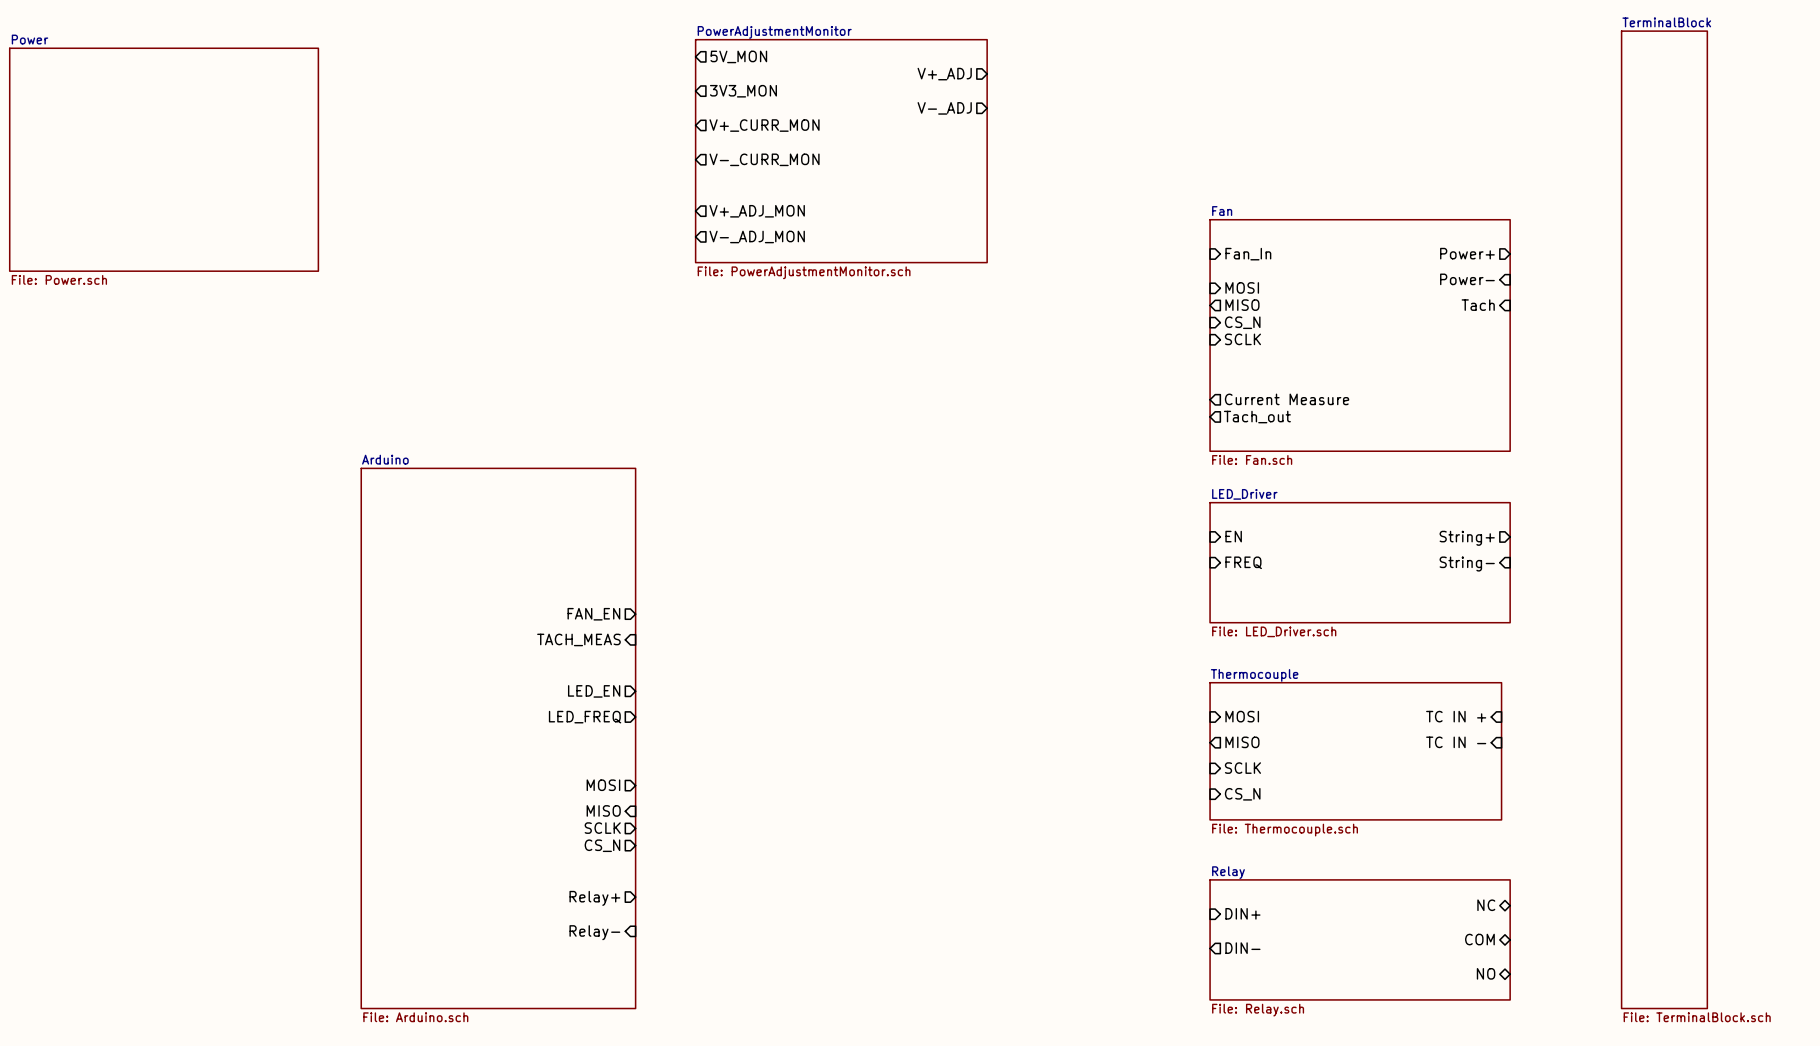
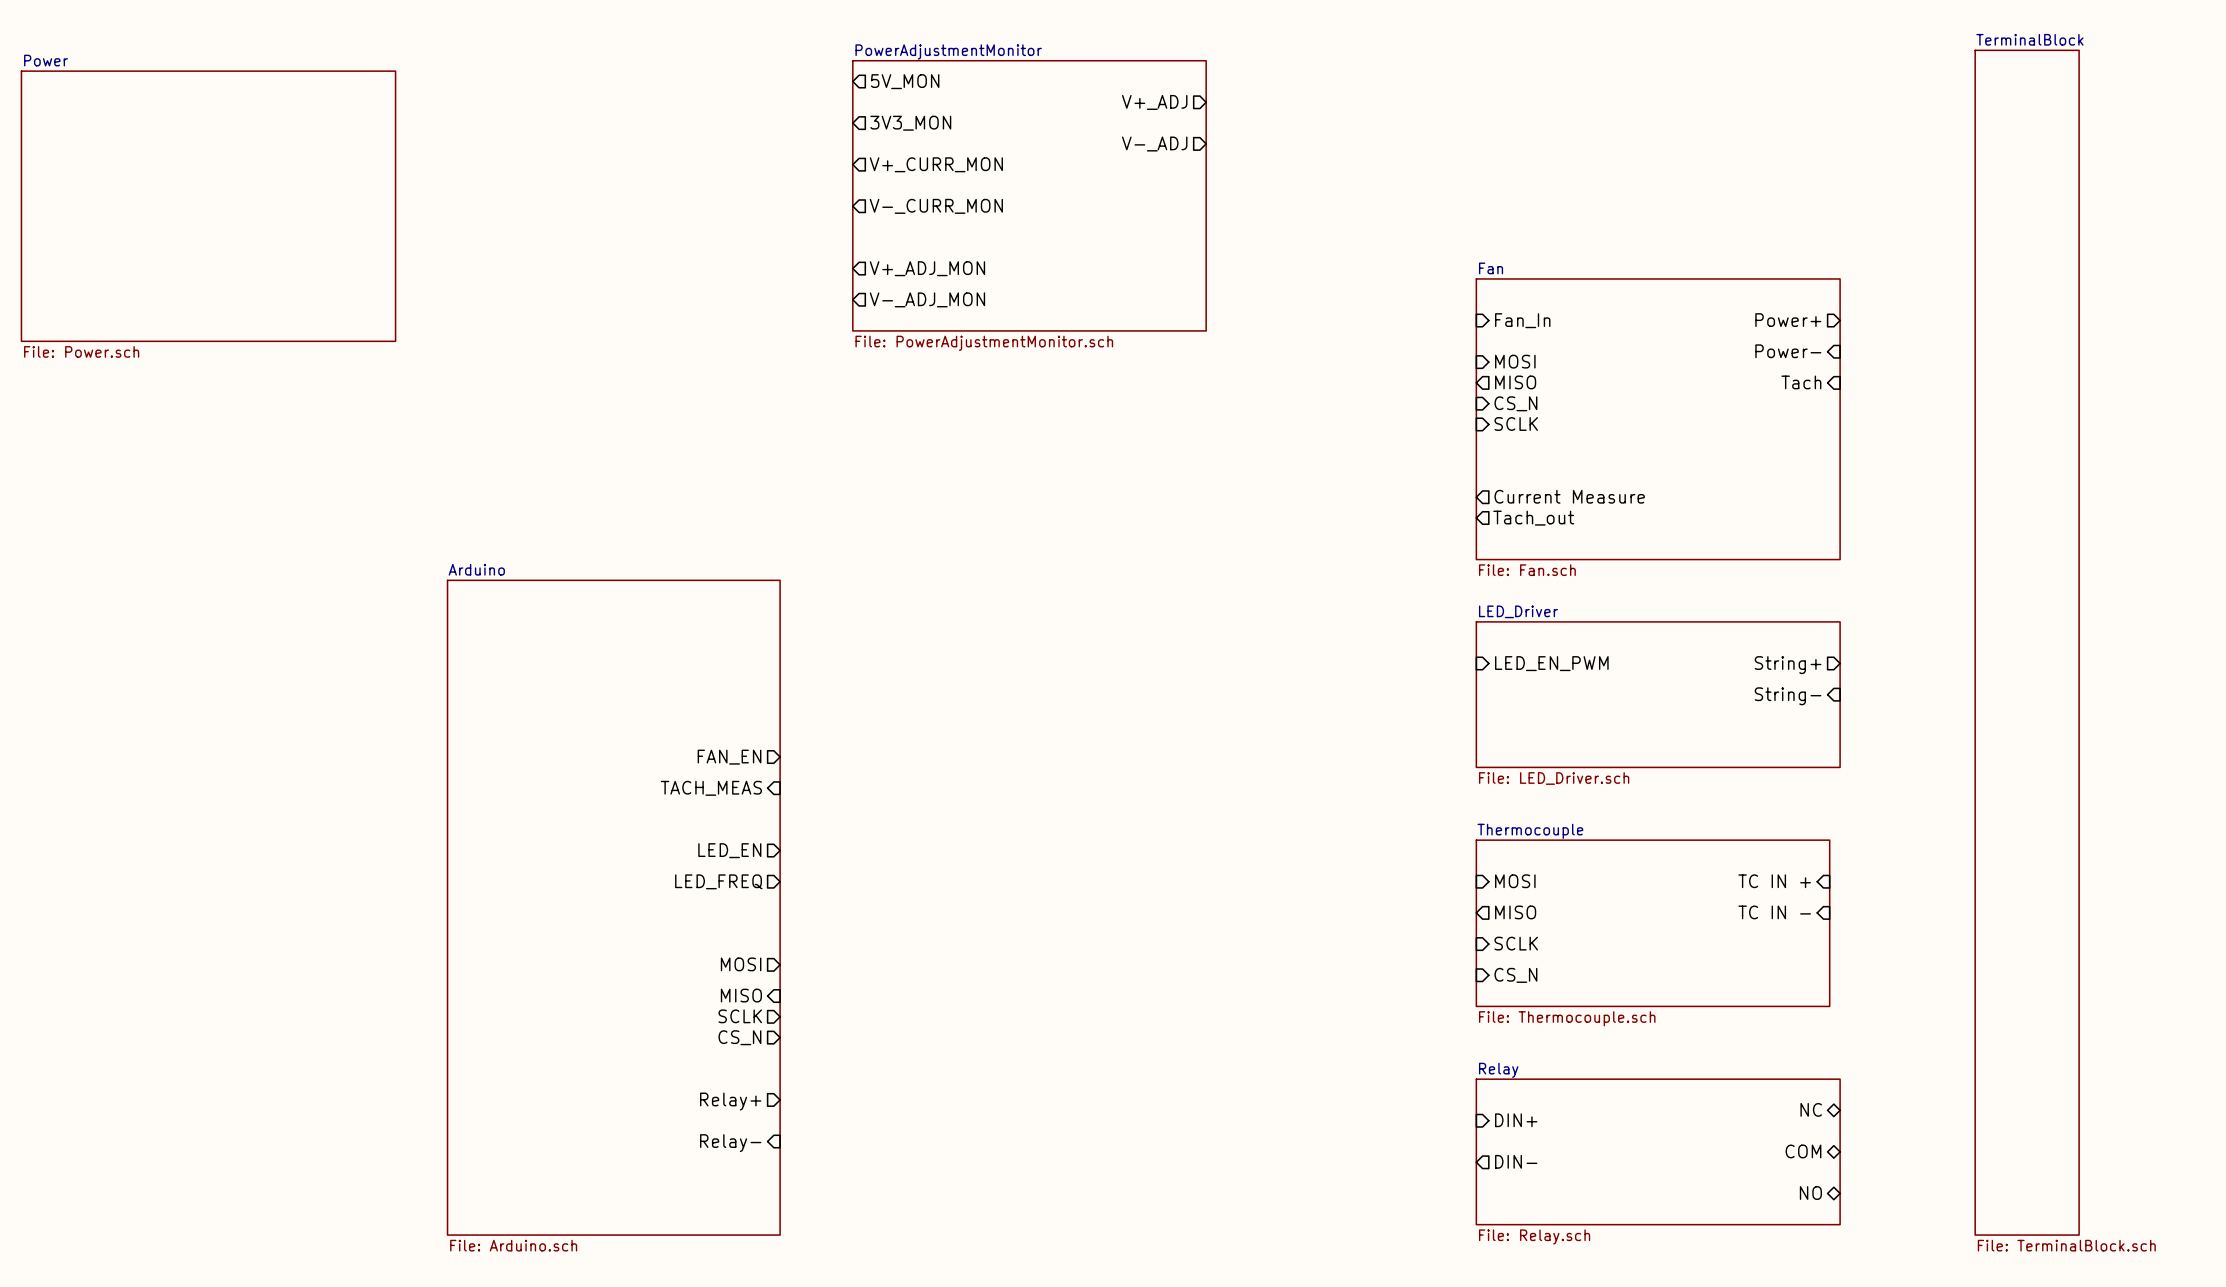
sheet pin: EN (1233, 536) -> LED_EN_PWM (1551, 663)
sheet pin: FREQ (1243, 562) -> none

